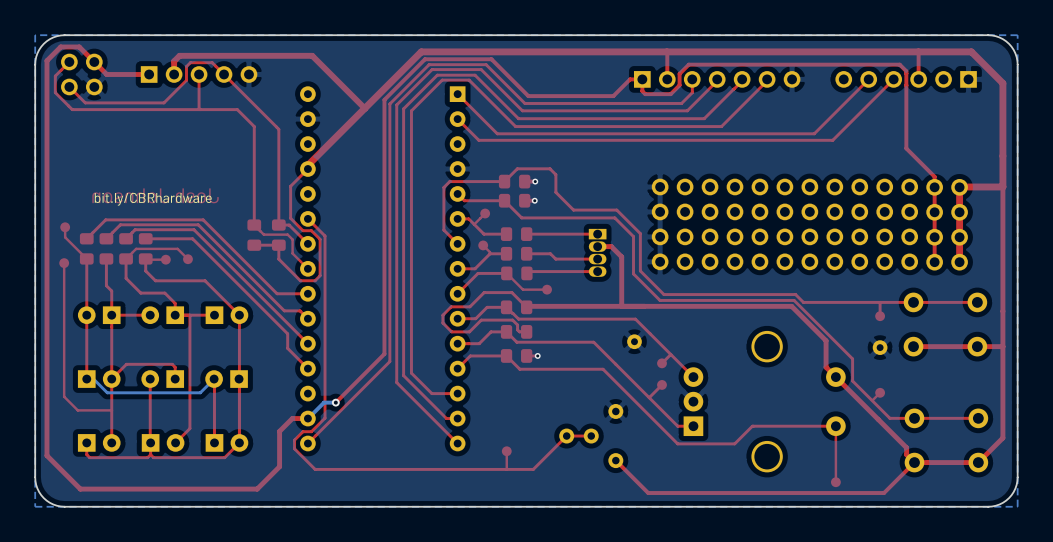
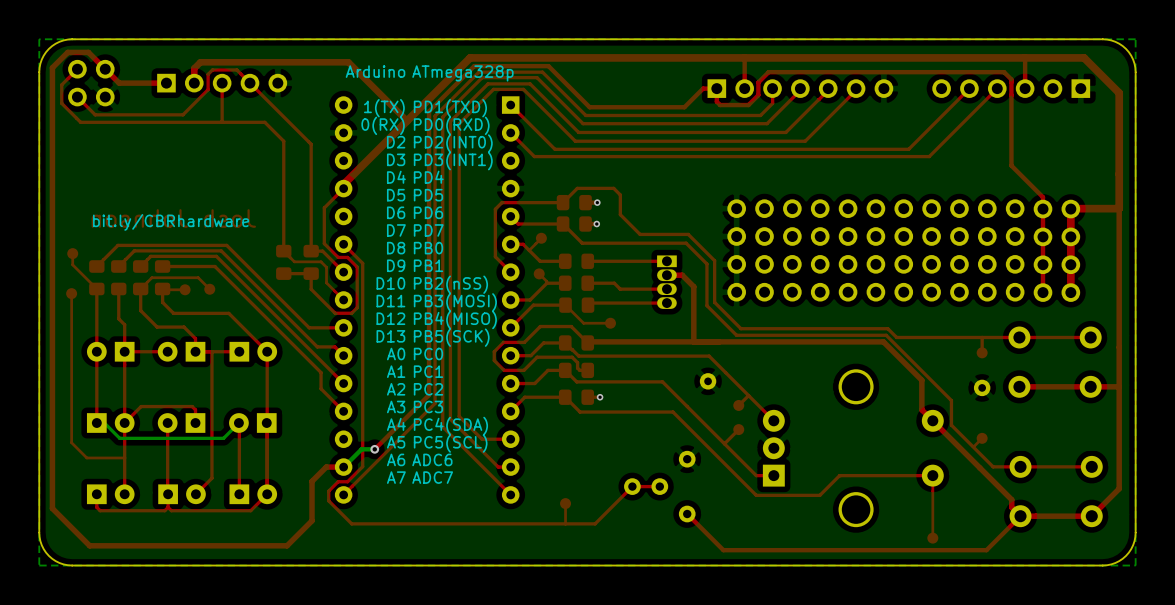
text: none -> Arduino (375, 71)
text: none -> ATmega328p (462, 73)
text: none -> 1(TX) (384, 108)
text: none -> PD1(TXD) (450, 108)
text: none -> 0(RX) (383, 125)
text: none -> PD0(RXD) (451, 125)
text: none -> D2 (396, 142)
text: none -> PD2(INT0) (453, 143)
text: none -> D3 (396, 159)
text: none -> PD3(INT1) (453, 161)
text: none -> D4 (396, 177)
text: none -> PD4 (428, 177)
text: none -> D5 (396, 195)
text: none -> PD5 (428, 195)
text: none -> D6 (396, 212)
text: none -> PD6 (428, 212)
text: none -> D7 (396, 230)
text: none -> PD7 (428, 230)
text: none -> D8 (396, 248)
text: none -> PB0 (428, 248)
text: none -> D9 (396, 265)
text: none -> PB1 (428, 265)
text: none -> D10 (390, 283)
text: none -> PB2(nSS) (450, 284)
text: none -> D11 (390, 301)
text: none -> PB3(MOSI) (455, 302)
text: none -> D12 (390, 318)
text: none -> PB4(MISO) (455, 320)
text: none -> D13 (390, 336)
text: none -> PB5(SCK) (451, 337)
text: none -> A0 (396, 354)
text: none -> PC0 (428, 354)
text: none -> A1 (396, 371)
text: none -> PC1 (428, 371)
text: none -> A2 (396, 389)
text: none -> PC2 (428, 389)
text: none -> A3 (396, 406)
text: none -> PC3 (428, 406)
text: none -> A4 (396, 424)
text: none -> PC4(SDA) (450, 425)
text: none -> A5 (396, 442)
text: none -> PC5(SCL) (450, 443)
text: none -> A6 (396, 459)
text: none -> ADC6 (432, 459)
text: none -> A7 (396, 477)
text: none -> ADC7 (432, 477)

